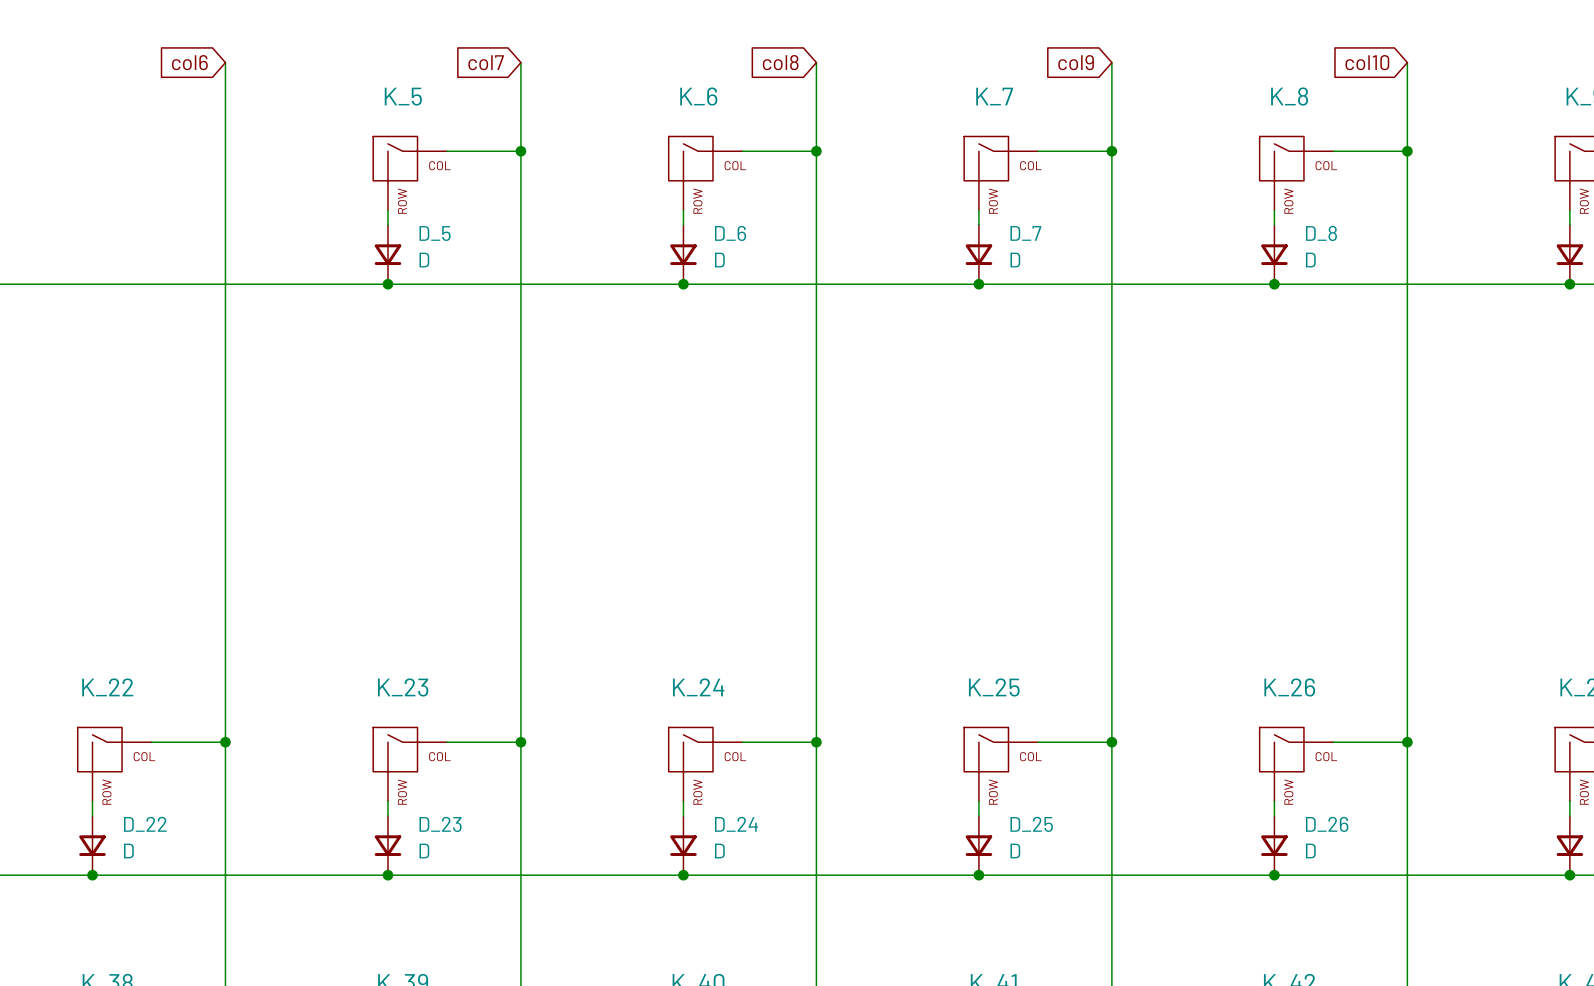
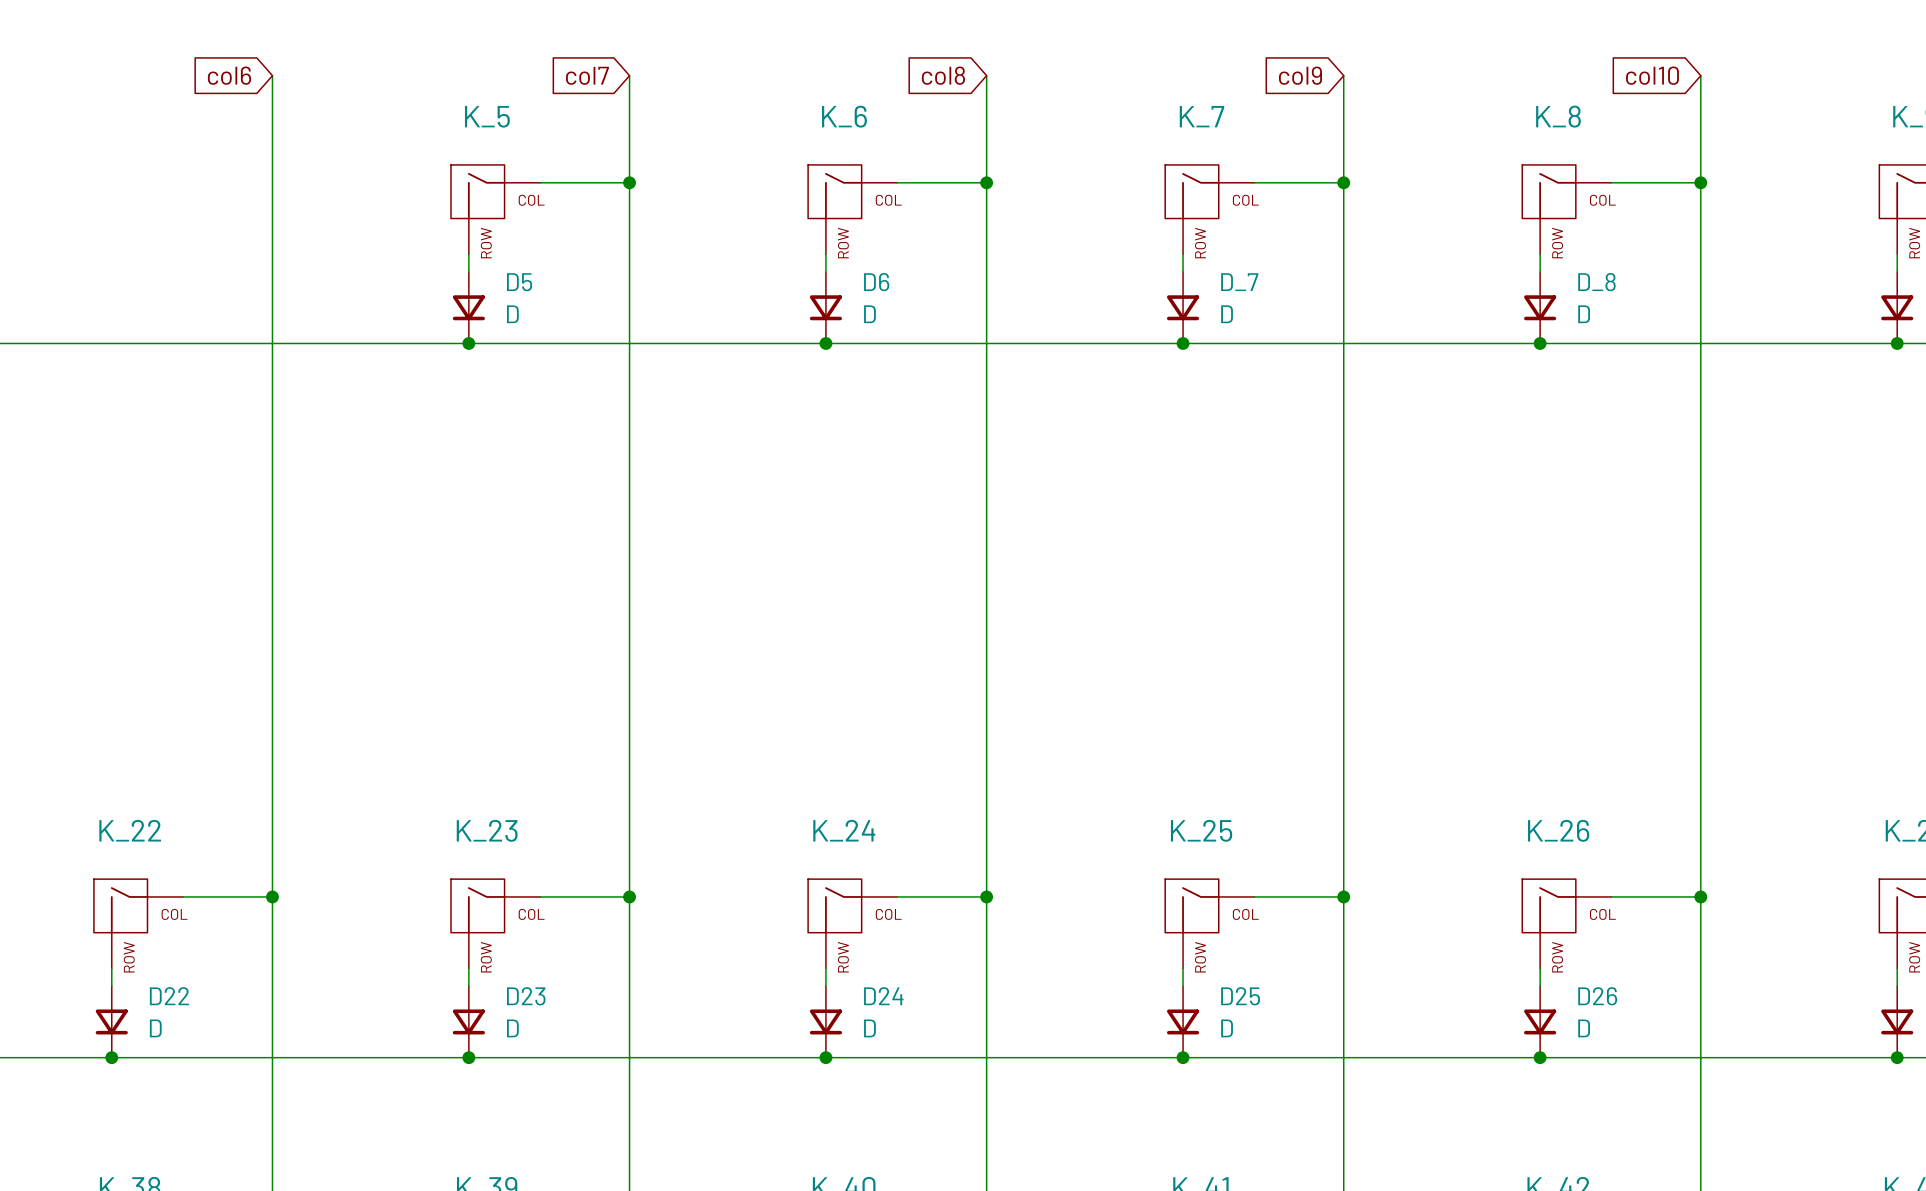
D_5 name: D_5 (435, 233) -> D5 (519, 282)
D_6 name: D_6 (730, 233) -> D6 (876, 282)
D_22 name: D_22 (145, 824) -> D22 (169, 996)
D_23 name: D_23 (440, 824) -> D23 (526, 996)
D_24 name: D_24 (736, 824) -> D24 (883, 996)
D_25 name: D_25 (1031, 824) -> D25 (1240, 996)
D_26 name: D_26 (1327, 824) -> D26 (1597, 996)

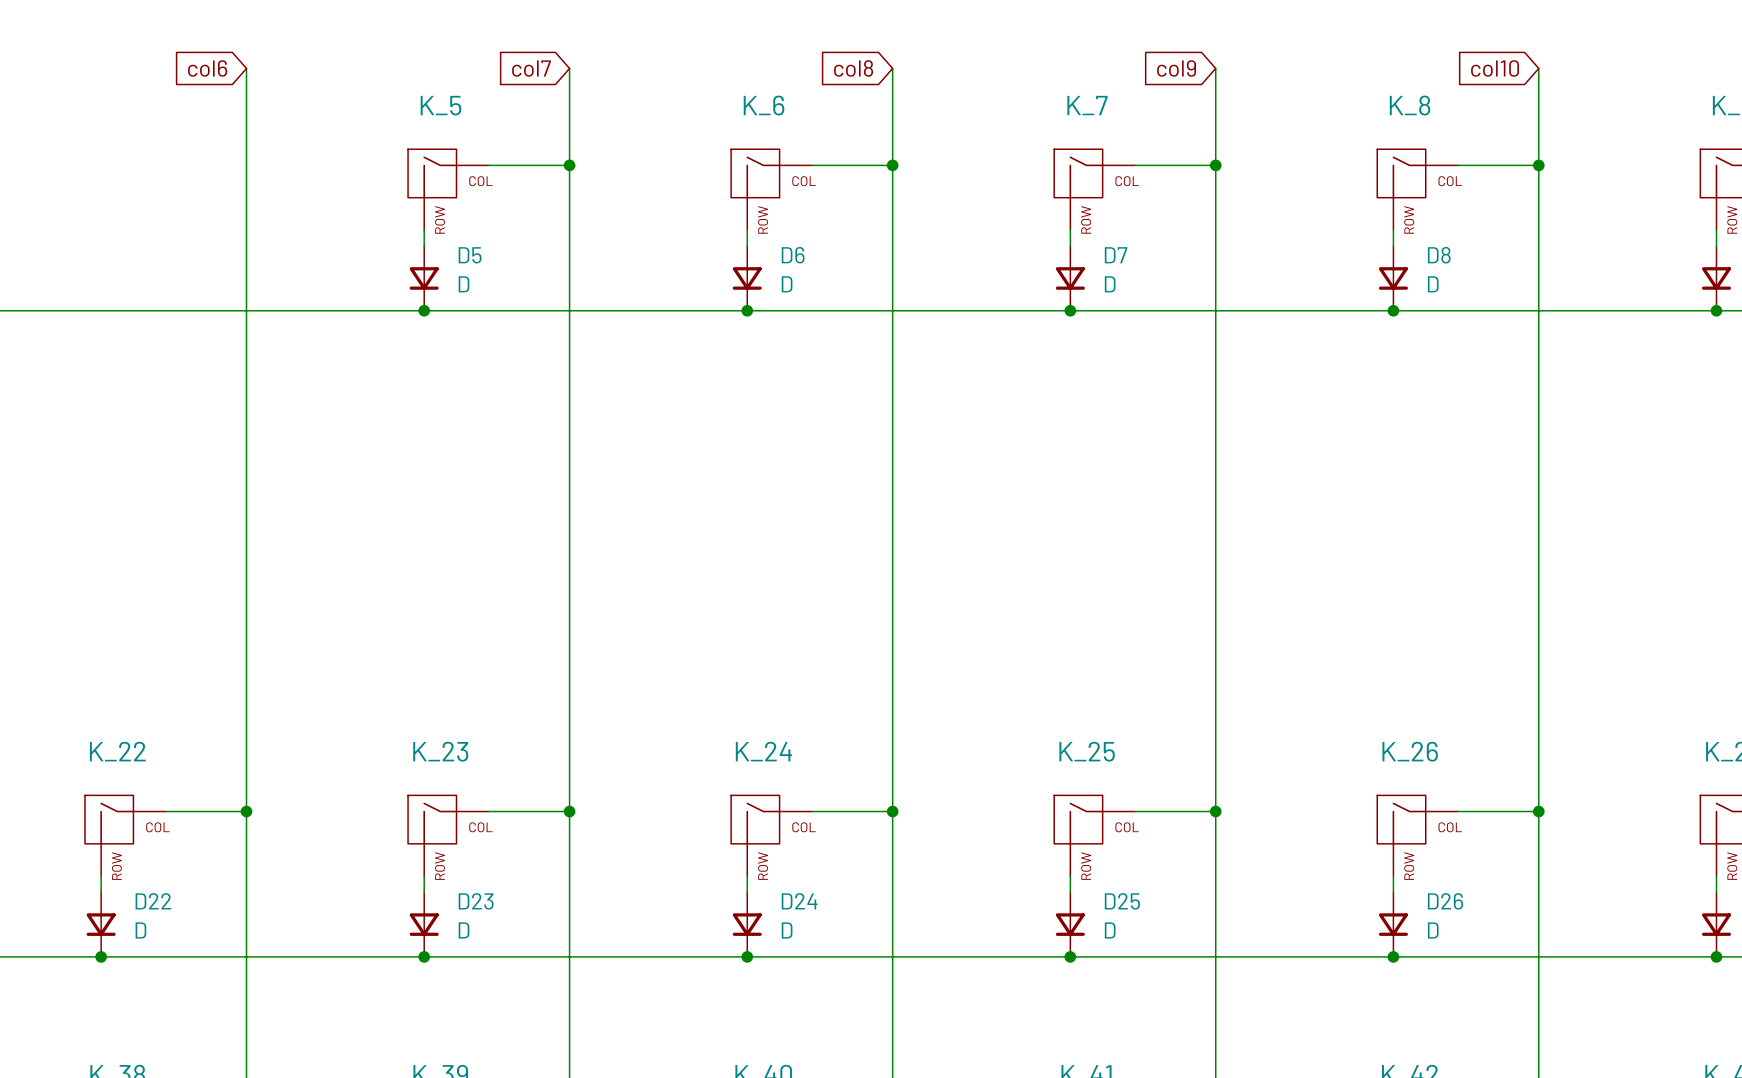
D_7 name: D_7 (1239, 282) -> D7 (1116, 255)
D_8 name: D_8 (1596, 282) -> D8 (1439, 255)

